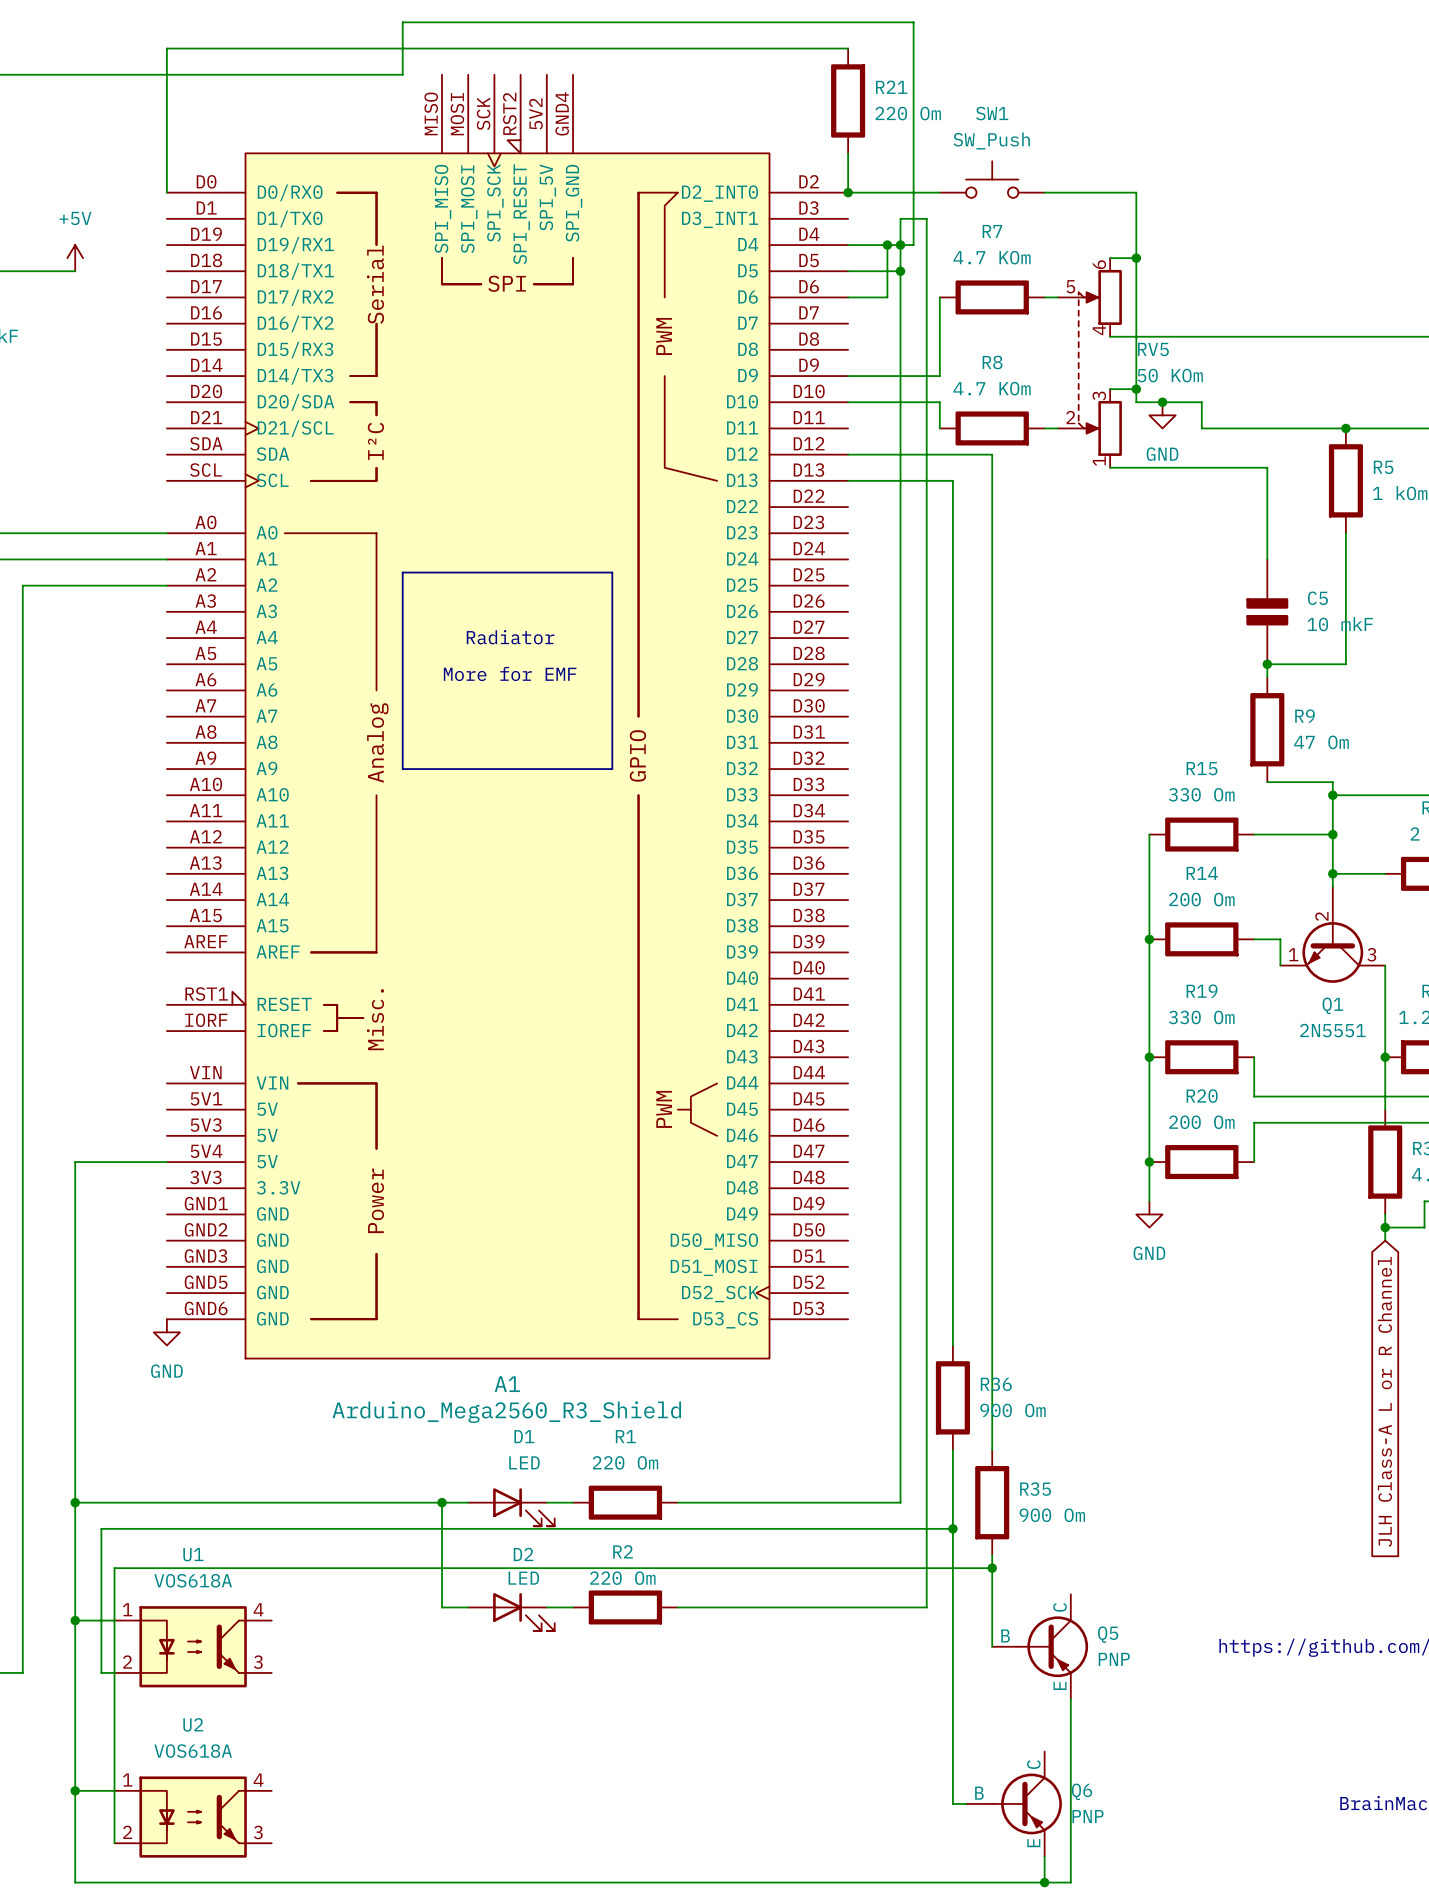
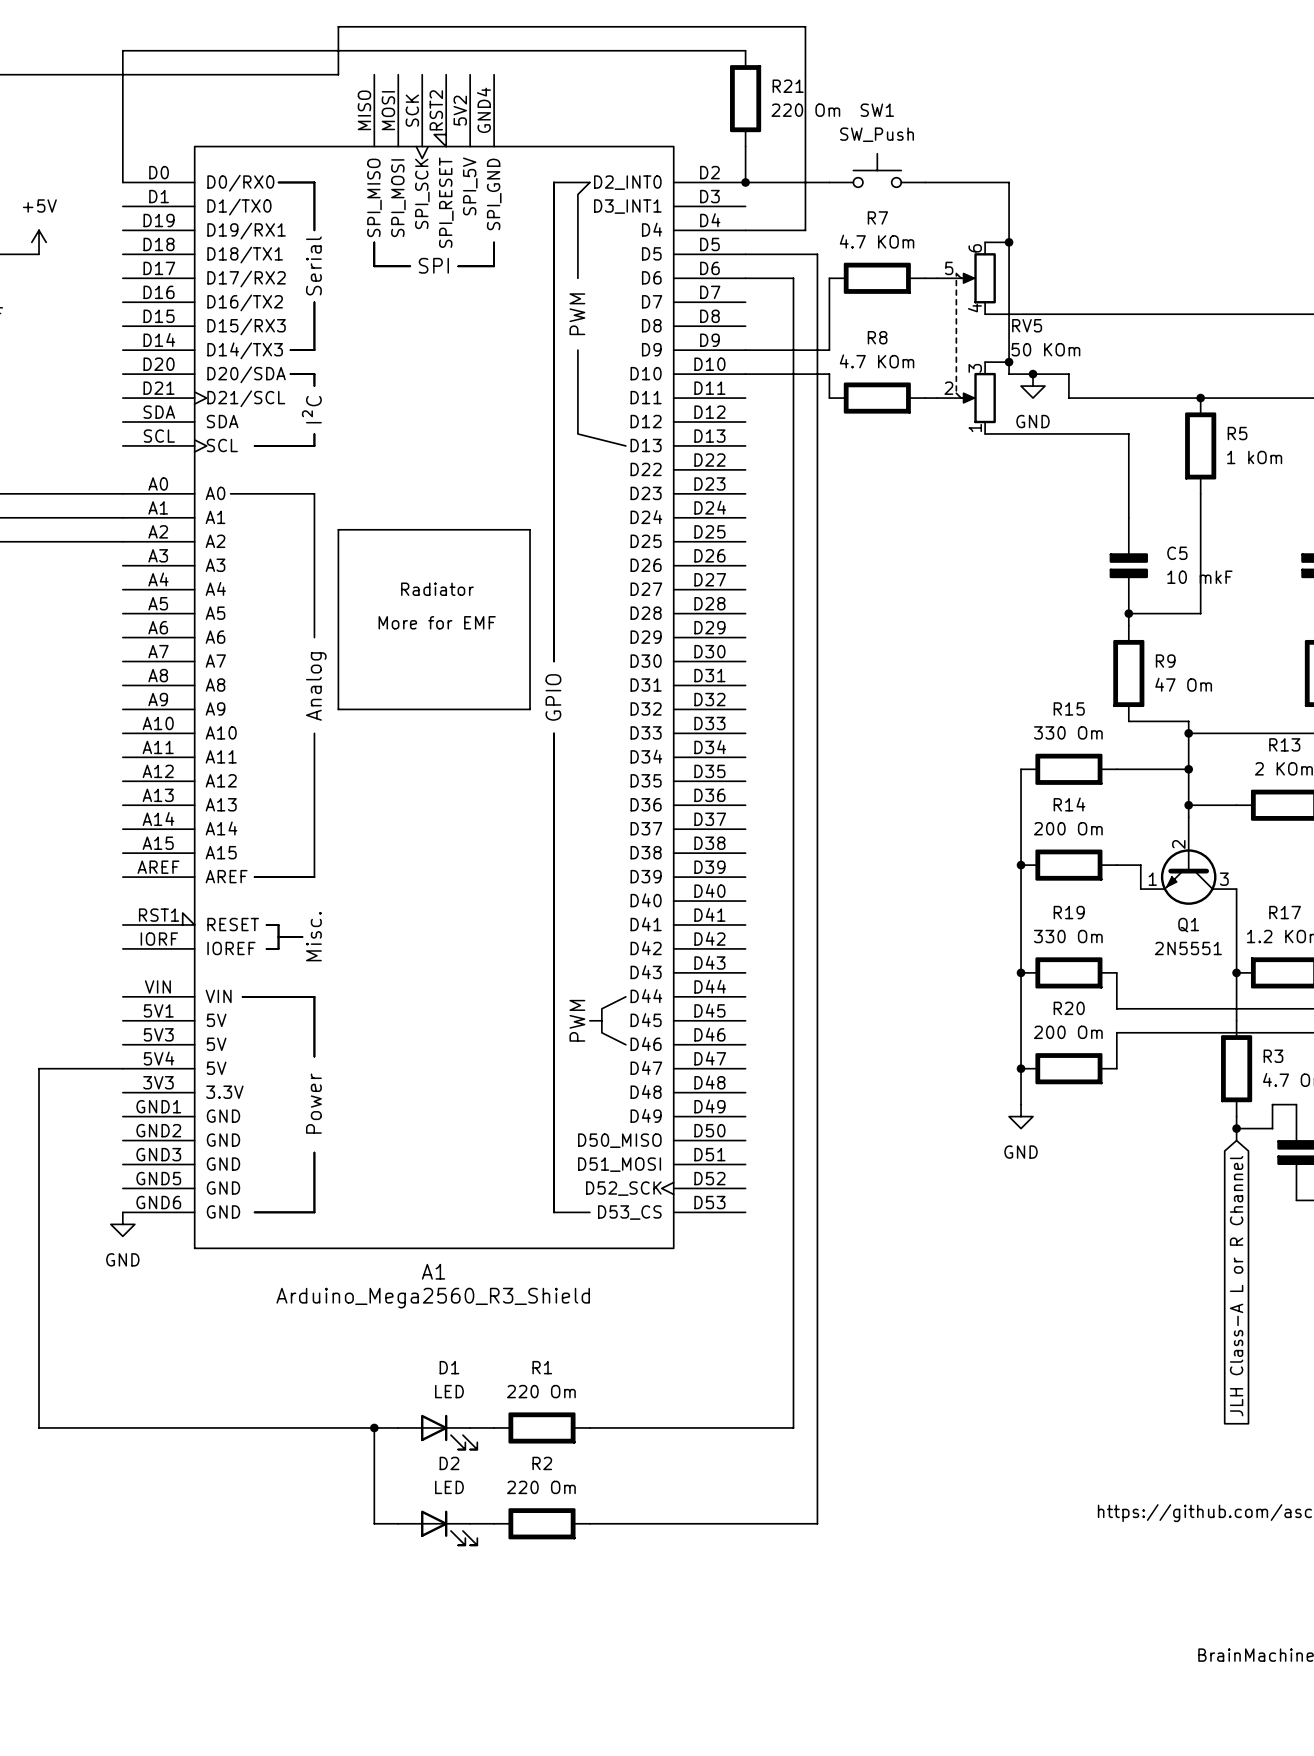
wire: (887, 245) (887, 297) -> (793, 278) (781, 278)
junction: (887, 245) -> none
junction: (900, 245) -> none
junction: (900, 271) -> none
wire: (926, 271) (926, 218) (900, 218) (900, 297) -> (817, 254) (793, 254)
wire: (848, 454) (992, 454) (992, 1450) -> none
wire: (848, 480) (952, 480) (952, 1345) -> none
R36: 900 Om (952, 1397) -> none
wire: (952, 1450) (952, 1803) (966, 1803) -> none
wire: (75, 1502) (468, 1502) -> none
junction: (75, 1502) -> none
wire: (442, 1502) (442, 1555) -> none
junction position: (442, 1502) -> (374, 1427)
wire: (546, 1502) (573, 1502) -> (470, 1427) (494, 1427)
R1 position: (625, 1502) -> (541, 1427)
wire: (677, 1502) (900, 1502) -> (589, 1427) (793, 1427) (793, 1380)
R35: 900 Om (992, 1502) -> none
D1 position: (511, 1507) -> (437, 1432)
wire: (952, 1528) (101, 1528) (101, 1672) (114, 1672) -> none
junction: (952, 1528) -> none
R2 name position: R2 (623, 1551) -> R2 (542, 1463)
D2 name position: D2 (523, 1554) -> D2 (449, 1463)
wire: (75, 1555) (75, 1882) (1070, 1882) (1070, 1699) -> (39, 1427) (398, 1427)
wire: (992, 1555) (992, 1646) -> none
wire: (992, 1568) (114, 1568) (114, 1843) -> none
junction: (992, 1568) -> none
D2 value position: LED (523, 1578) -> LED (449, 1487)
R2 value position: 220 Om (622, 1578) -> 220 Om (541, 1487)
wire: (442, 1607) (468, 1607) -> (374, 1475) (374, 1523) (398, 1523)
wire: (546, 1607) (573, 1607) -> (470, 1523) (494, 1523)
R2 position: (625, 1607) -> (541, 1523)
wire: (677, 1607) (926, 1607) -> (589, 1523) (817, 1523) (817, 1475)
D2 position: (511, 1612) -> (437, 1527)
wire: (75, 1620) (114, 1620) -> none
junction: (75, 1620) -> none
U1: VOS618A (193, 1646) -> none
Q5: PNP (1040, 1646) -> none
wire: (75, 1790) (114, 1790) -> none
junction: (75, 1790) -> none
Q6: PNP (1013, 1803) -> none
U2: VOS618A (193, 1817) -> none
wire: (1044, 1856) (1044, 1882) -> none
junction: (1044, 1882) -> none

